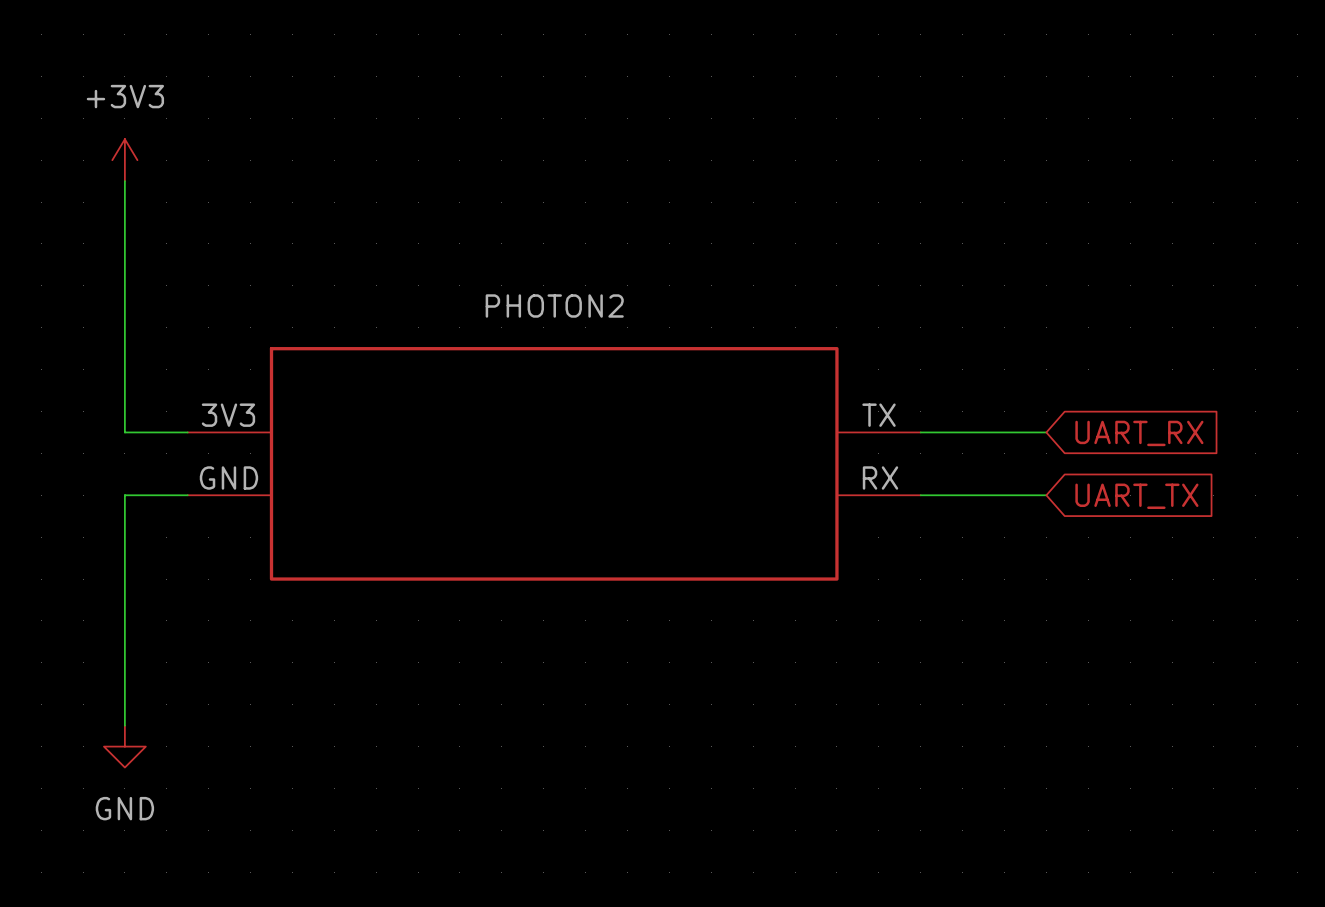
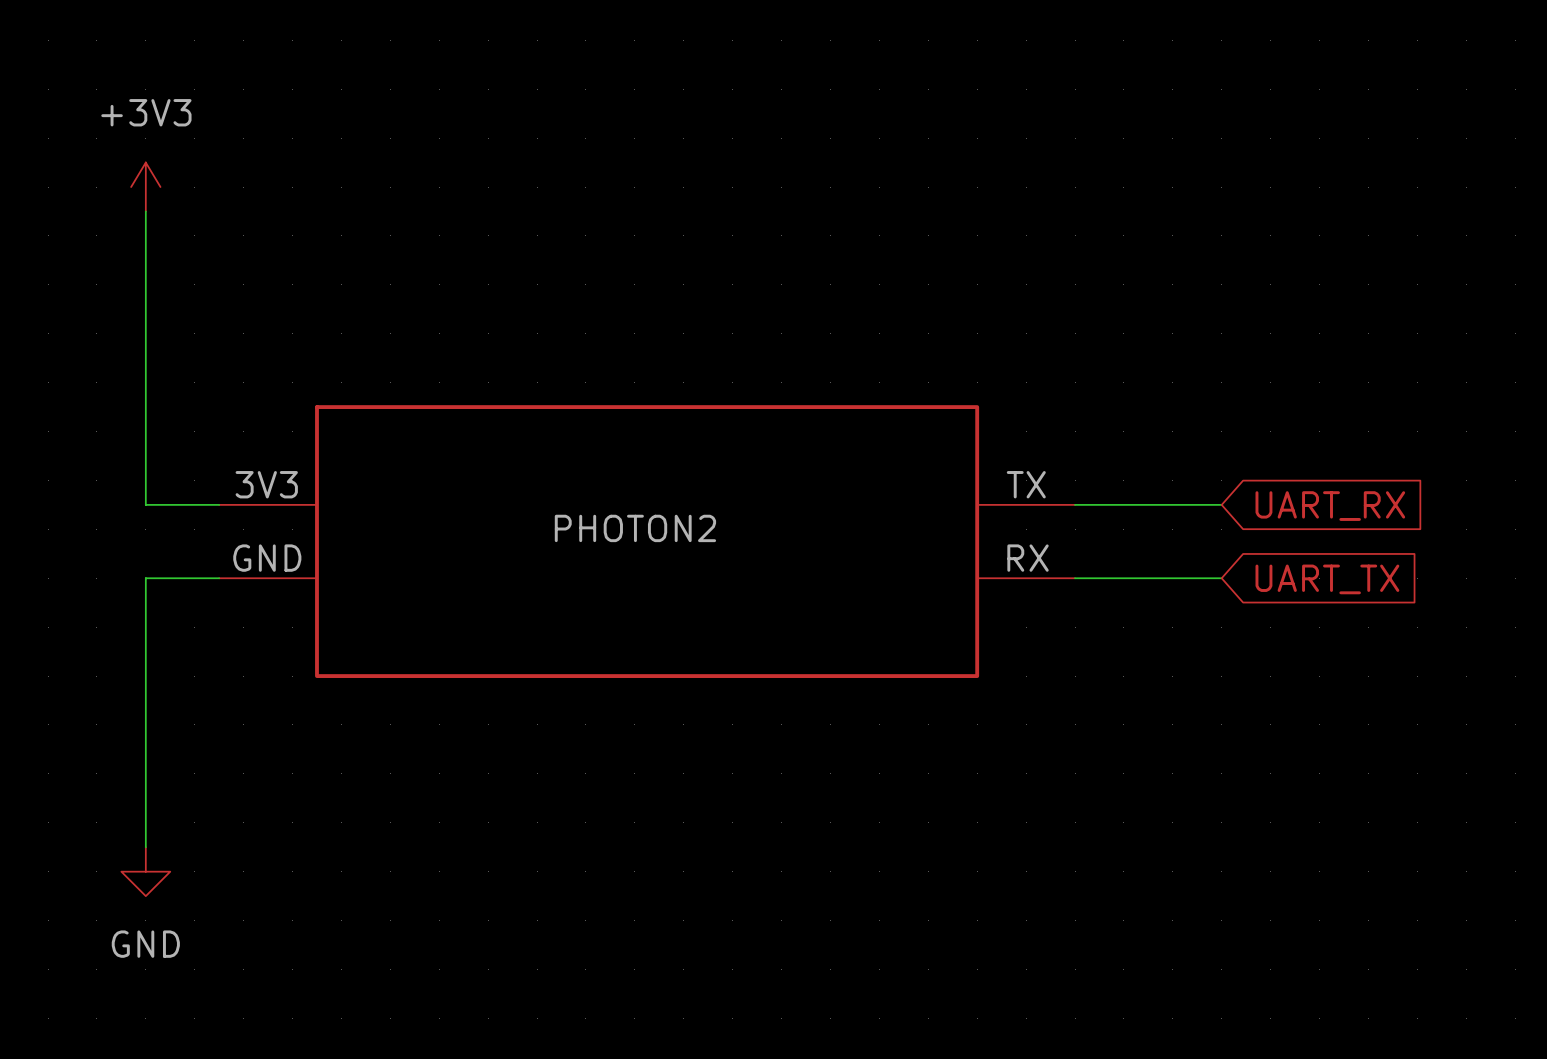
PHOTON2 name position: PHOTON2 (554, 306) -> PHOTON2 (635, 528)

